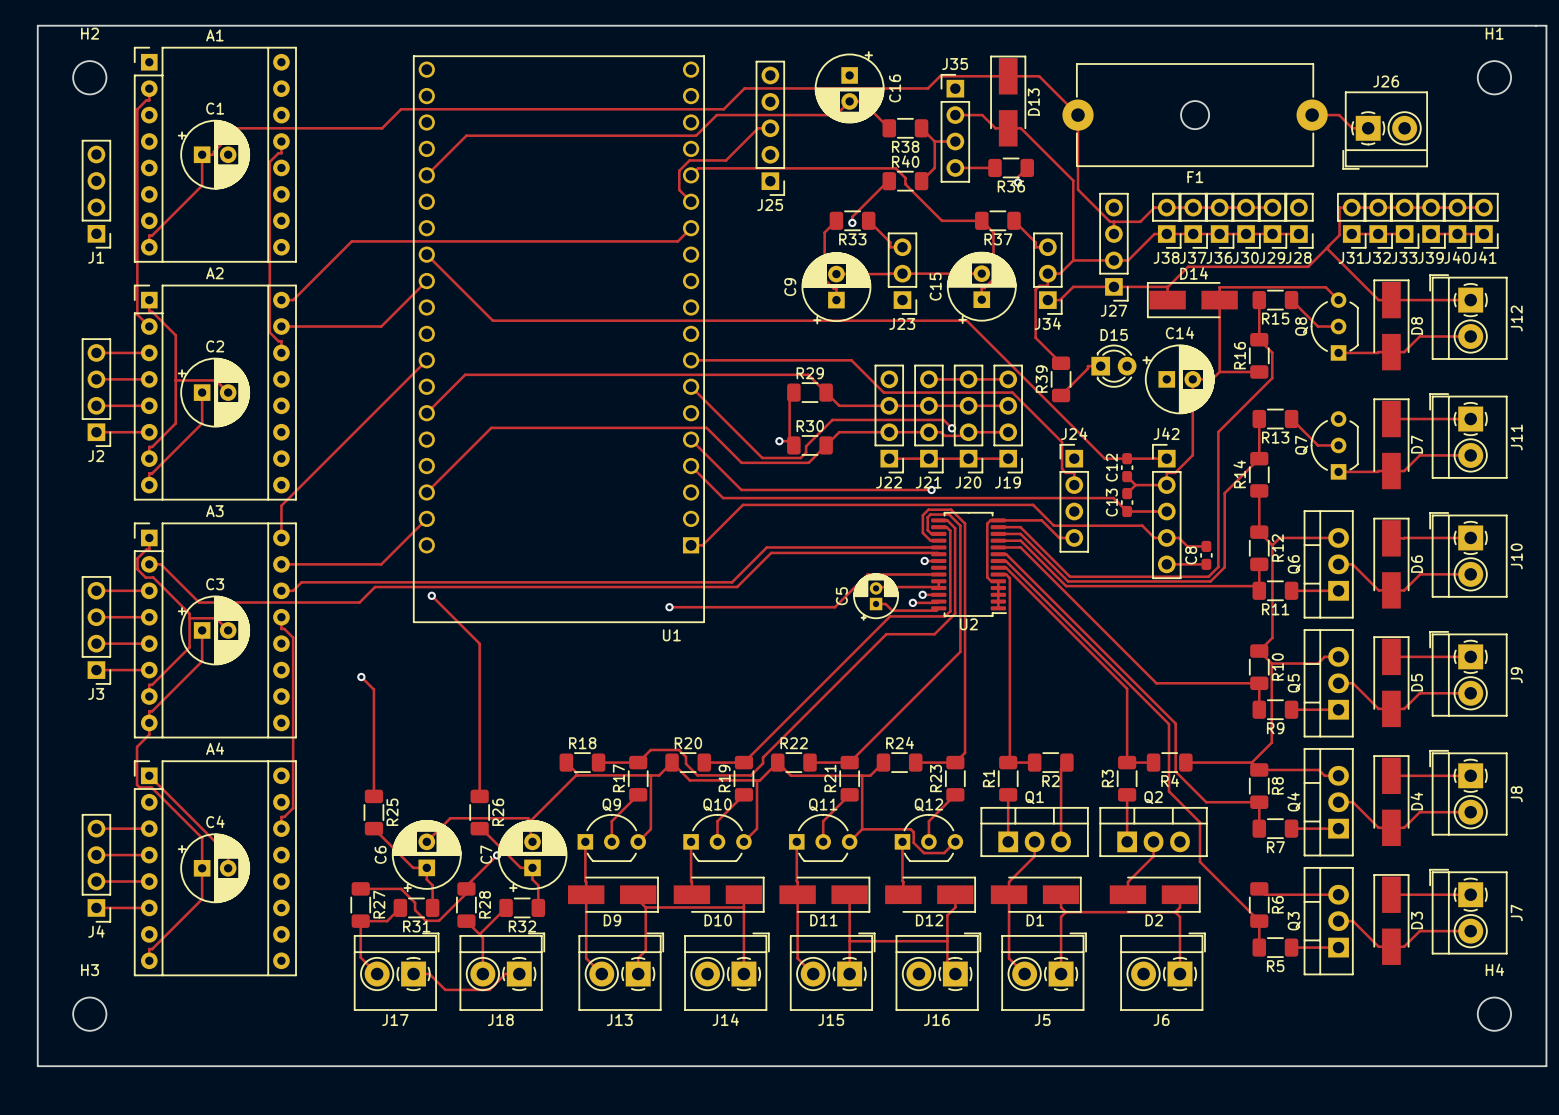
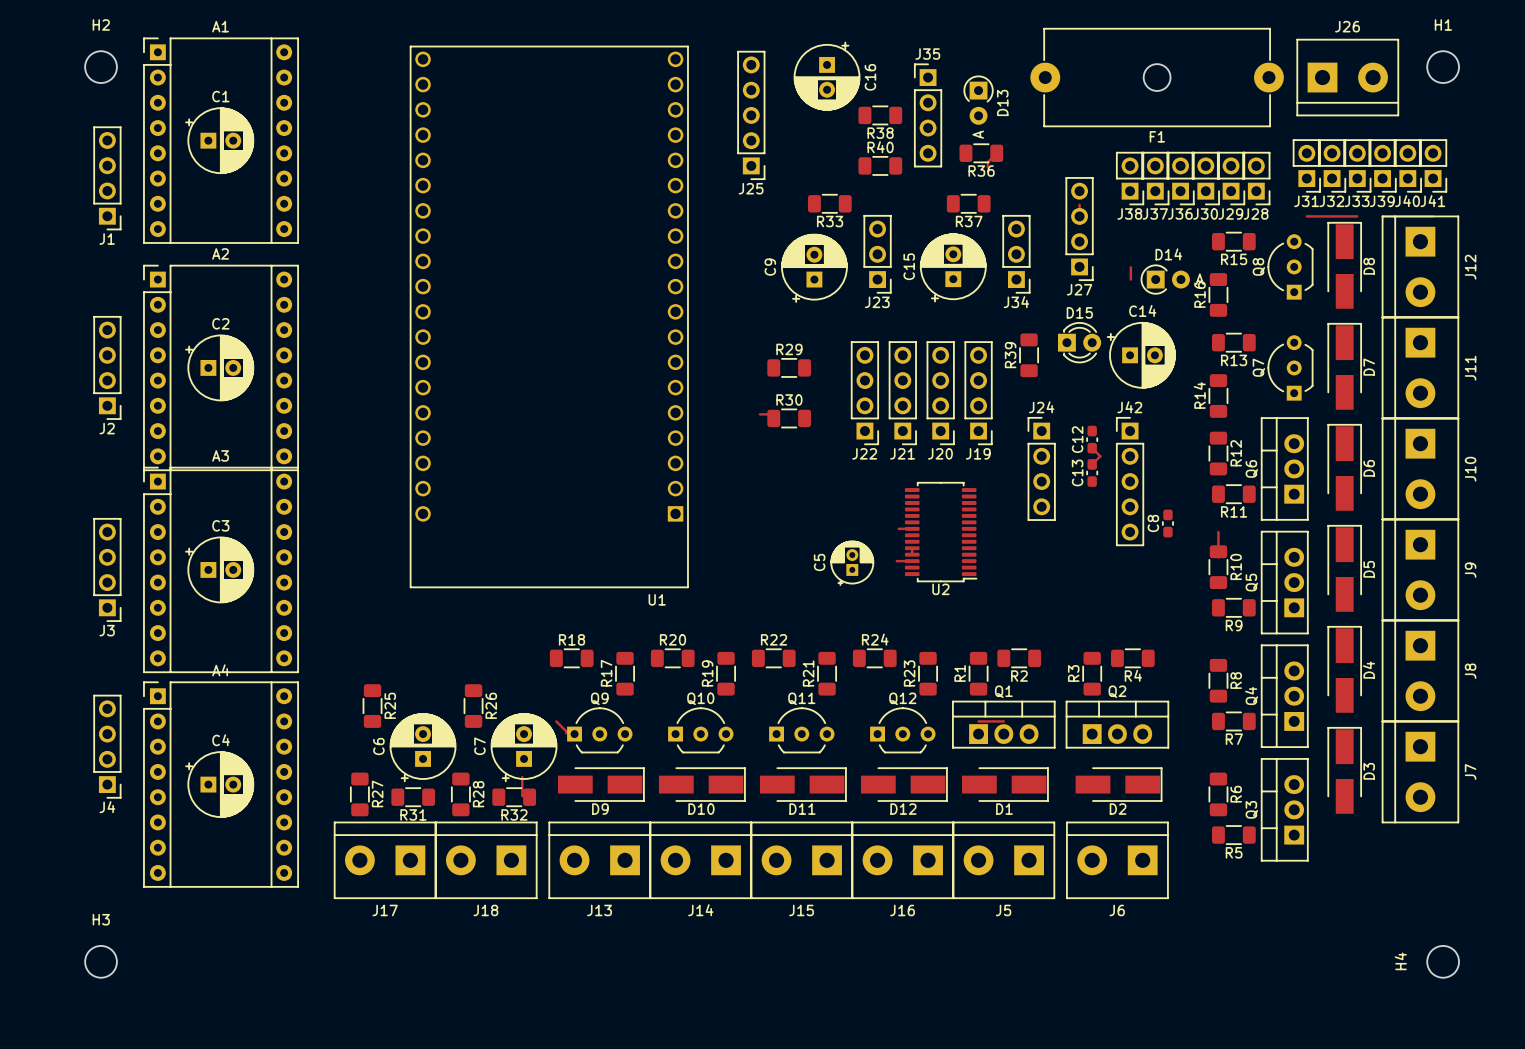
board edge: (37, 25) (37, 1066) (1546, 1066) (1546, 25) (37, 25) -> none
D13 footprint: [990, 55, 1027, 147] -> [963, 75, 994, 125]
track: (149, 88) (149, 100) (146, 100) (137, 109) (137, 314) (149, 326) -> none
J26 footprint: [1342, 91, 1428, 170] -> [1296, 39, 1399, 117]
track: (955, 115) (982, 115) (995, 128) (1020, 128) (1073, 180) (1073, 260) -> none
F1 position: (1195, 115) -> (1157, 77)
track: (1312, 115) (1339, 115) (1352, 128) (1368, 128) -> none
track: (770, 128) (758, 128) (725, 160) (689, 160) (679, 170) (679, 189) (691, 201) -> none
track: (889, 128) (862, 101) (849, 101) (836, 115) (716, 115) (696, 135) (466, 135) (426, 175) -> none
track: (921, 128) (934, 141) -> none
track: (281, 141) (281, 153) (278, 153) (269, 162) (269, 332) (278, 341) (281, 341) (281, 352) -> none
track: (934, 141) (955, 141) -> none
track: (934, 141) (934, 167) (921, 181) -> none
track: (955, 167) (995, 167) -> none
track: (691, 175) (698, 168) (895, 168) (905, 177) (905, 184) (941, 220) (981, 220) (993, 232) (993, 279) (984, 287) (981, 287) (981, 299) -> none
track: (889, 181) (852, 216) (852, 222) -> none
via: (1017, 182) -> none
track: (1272, 207) (1154, 207) (1140, 221) (1110, 221) (1078, 189) (1078, 115) (1039, 76) (940, 76) (927, 88) (744, 88) (723, 109) (401, 109) (382, 128) (237, 128) (213, 151) (213, 154) (202, 154) (202, 185) (152, 235) (149, 235) (149, 247) -> none
track: (1483, 207) (1339, 207) (1339, 235) (1308, 266) (1188, 266) (1167, 287) (1073, 286) (1060, 300) (1047, 300) -> none
track: (836, 220) (824, 232) (824, 279) (833, 288) (836, 288) (836, 300) -> none
track: (868, 220) (890, 242) (890, 247) (902, 247) -> none
track: (1014, 220) (1035, 242) (1035, 247) (1047, 247) -> none
J38 position: (1166, 220) -> (1130, 178)
J37 position: (1193, 220) -> (1155, 178)
J36 position: (1219, 220) -> (1180, 178)
J30 position: (1246, 220) -> (1205, 178)
J29 position: (1272, 220) -> (1231, 178)
J28 position: (1298, 220) -> (1256, 178)
J31 position: (1351, 220) -> (1306, 165)
J32 position: (1378, 220) -> (1332, 165)
J33 position: (1404, 220) -> (1357, 165)
J39 position: (1431, 220) -> (1382, 165)
J40 position: (1457, 220) -> (1407, 165)
J41 position: (1483, 220) -> (1433, 165)
via: (852, 222) -> none
track: (691, 228) (677, 241) (351, 241) (293, 300) (281, 300) -> none
track: (1298, 234) (1154, 234) (1128, 260) (1073, 260) -> none
track: (1326, 248) (1378, 300) (1470, 300) -> none
track: (426, 254) (492, 320) (966, 320) (1104, 458) (1166, 458) -> none
track: (1073, 260) (1060, 273) (1047, 273) (1047, 285) (1039, 285) (1035, 289) (1035, 337) (1061, 363) -> none
track: (981, 273) (836, 274) -> none
J12 footprint: [1429, 274, 1508, 360] -> [1381, 215, 1459, 319]
track: (426, 281) (381, 326) (281, 326) -> none
D14 footprint: [1147, 282, 1238, 318] -> [1140, 264, 1190, 295]
track: (149, 300) (149, 311) (152, 311) (175, 335) (175, 423) (152, 446) (149, 446) (149, 458) -> none
track: (1259, 300) (1259, 339) (1272, 352) (1272, 378) (1218, 432) (1218, 566) (1208, 576) (1070, 576) (1020, 527) (998, 527) -> none
R15 position: (1275, 300) -> (1233, 241)
track: (1291, 300) (1317, 326) (1338, 326) -> none
track: (1338, 300) (1325, 287) (1219, 287) (1219, 371) -> none
D8 position: (1391, 325) -> (1344, 265)
Q8 position: (1334, 326) -> (1290, 266)
track: (1470, 336) (1419, 336) (1404, 352) (1338, 352) -> none
track: (96, 352) (149, 352) -> none
R16 position: (1259, 355) -> (1218, 294)
track: (426, 360) (281, 505) (281, 537) -> none
track: (691, 360) (851, 360) (883, 392) (1012, 392) (1062, 442) (1062, 469) (1065, 472) (1074, 472) (1074, 485) -> none
track: (1100, 366) (1087, 366) (1087, 368) (1061, 395) -> none
track: (1219, 371) (1212, 379) (1192, 379) (1192, 455) (1175, 472) (1166, 472) (1166, 485) (1135, 485) -> none
track: (1219, 371) (1259, 371) -> none
track: (96, 379) (149, 379) -> none
track: (928, 379) (1008, 379) -> none
track: (175, 380) (216, 380) (228, 392) -> none
track: (691, 386) (762, 458) (800, 458) (806, 452) (806, 446) (832, 419) (943, 419) (951, 428) -> none
track: (202, 392) (202, 423) (152, 473) (149, 473) (149, 485) -> none
track: (793, 392) (789, 396) (789, 441) (793, 445) -> none
J11 footprint: [1429, 393, 1508, 479] -> [1381, 316, 1459, 420]
track: (96, 405) (149, 405) -> none
track: (1008, 405) (839, 405) (808, 374) (465, 374) (426, 413) -> none
track: (1259, 419) (1259, 458) (1224, 493) (1224, 567) (1210, 581) (1068, 581) (1020, 533) (998, 533) -> none
R13 position: (1275, 419) -> (1233, 342)
track: (1291, 419) (1317, 445) (1338, 445) -> none
track: (1391, 419) (1470, 419) -> none
via: (951, 428) -> none
track: (96, 432) (149, 432) -> none
track: (1008, 432) (968, 432) (964, 435) (944, 435) (941, 432) (839, 432) (808, 462) (741, 462) (706, 427) (491, 427) (426, 492) -> none
track: (691, 439) (741, 489) (931, 489) -> none
via: (779, 441) -> none
D7 position: (1391, 443) -> (1344, 366)
Q7 position: (1334, 445) -> (1290, 367)
track: (1470, 455) (1419, 455) (1404, 471) (1338, 471) -> none
track: (889, 458) (1008, 458) -> none
track: (691, 466) (723, 498) (1113, 498) (1127, 511) (1166, 511) -> none
R14 position: (1259, 474) -> (1218, 395)
via: (931, 489) -> none
track: (1259, 490) (1259, 532) (1272, 545) -> none
J10 footprint: [1429, 512, 1508, 598] -> [1381, 417, 1459, 521]
track: (426, 518) (381, 564) (281, 564) -> none
track: (938, 520) (947, 520) (955, 528) (955, 613) (934, 634) (886, 634) (763, 757) (763, 763) (751, 775) (697, 775) (686, 763) (686, 756) (679, 750) (650, 750) (638, 762) (598, 762) -> none
track: (938, 527) (946, 527) (950, 530) (950, 611) (945, 616) (890, 616) (743, 762) (704, 762) -> none
track: (938, 533) (931, 533) (927, 530) (927, 517) (930, 514) (949, 514) (960, 525) (960, 651) (849, 762) (810, 762) -> none
track: (149, 537) (149, 549) (146, 549) (137, 558) (137, 569) (145, 577) (153, 577) (189, 613) (189, 647) (152, 684) (149, 684) (149, 696) -> none
track: (1074, 537) (1059, 537) (1041, 520) (990, 520) (987, 523) (987, 577) (991, 581) (998, 581) (998, 608) -> none
track: (1338, 537) (1279, 537) (1272, 545) -> none
track: (1470, 537) (1391, 538) -> none
track: (938, 540) (930, 540) (922, 532) (922, 515) (928, 509) (951, 509) (965, 523) (965, 752) (955, 762) (915, 762) -> none
track: (998, 540) (1020, 540) (1066, 586) (1259, 586) -> none
track: (691, 545) (702, 545) (742, 504) (1033, 504) (1053, 525) (1142, 525) (1154, 537) (1179, 537) (1187, 546) (1206, 546) -> none
track: (1272, 545) (1272, 637) (1259, 651) (1271, 663) -> none
track: (938, 547) (766, 547) (732, 582) (301, 582) (293, 590) (281, 590) -> none
track: (998, 547) (1020, 547) (1156, 683) (1259, 683) (1259, 709) -> none
R12 position: (1259, 548) -> (1218, 453)
track: (938, 554) (771, 552) (737, 587) (375, 587) (359, 602) (199, 602) (161, 564) (149, 564) -> none
track: (998, 554) (1006, 554) (1175, 723) (1175, 771) (1206, 802) (1259, 802) (1259, 828) -> none
via: (924, 560) -> none
track: (998, 560) (1005, 560) (1169, 724) (1169, 791) (1199, 822) (1199, 861) (1259, 921) (1259, 947) -> none
D6 position: (1391, 563) -> (1344, 467)
track: (1166, 564) (1206, 564) -> none
Q6 position: (1328, 564) -> (1284, 468)
track: (1338, 564) (1352, 564) (1378, 590) (1404, 590) (1420, 574) (1470, 574) -> none
track: (998, 567) (1006, 567) (1127, 688) (1127, 762) (1153, 762) -> none
track: (938, 574) (867, 574) (834, 607) (669, 607) -> none
track: (998, 574) (1006, 574) (1009, 578) (1009, 762) -> none
track: (938, 587) (876, 588) -> none
track: (96, 590) (149, 590) -> none
R11 position: (1275, 590) -> (1233, 494)
track: (1291, 590) (1338, 590) -> none
via: (922, 594) -> none
track: (431, 595) (479, 643) (479, 796) -> none
via: (431, 595) -> none
track: (938, 601) (912, 602) -> none
via: (912, 602) -> none
track: (876, 604) (885, 604) (892, 610) (936, 610) (938, 608) -> none
via: (669, 607) -> none
track: (96, 617) (149, 617) -> none
track: (281, 617) (281, 628) (284, 628) (293, 637) (293, 808) (284, 816) (281, 816) (281, 828) -> none
track: (189, 618) (216, 618) (228, 630) -> none
J3 position: (96, 630) -> (107, 569)
track: (202, 630) (202, 661) (152, 711) (149, 711) (149, 734) (137, 746) (137, 784) (139, 787) (151, 787) (202, 838) (202, 899) (152, 949) (149, 949) (149, 960) -> none
C3 position: (213, 630) -> (219, 569)
A3 position: (215, 630) -> (221, 569)
J9 footprint: [1429, 631, 1508, 717] -> [1381, 518, 1459, 622]
track: (96, 643) (149, 643) -> none
track: (1338, 656) (1324, 656) (1318, 663) (1271, 663) -> none
track: (1391, 656) (1470, 656) -> none
track: (1271, 663) (1271, 742) (1251, 762) -> none
R10 position: (1259, 667) -> (1218, 567)
track: (96, 670) (149, 670) -> none
track: (361, 677) (373, 689) (373, 796) -> none
via: (361, 677) -> none
D5 position: (1391, 681) -> (1344, 568)
Q5 position: (1328, 683) -> (1284, 582)
track: (1338, 683) (1353, 683) (1378, 708) (1404, 708) (1419, 693) (1470, 693) -> none
R9 position: (1275, 709) -> (1233, 607)
track: (1291, 709) (1338, 709) -> none
J8 footprint: [1429, 750, 1508, 836] -> [1381, 619, 1459, 723]
R18 position: (582, 762) -> (571, 658)
R20 position: (688, 762) -> (672, 658)
R22 position: (793, 762) -> (773, 658)
track: (883, 762) (870, 775) (790, 775) (777, 762) (759, 780) (689, 780) (672, 762) (659, 775) (576, 774) (530, 820) (528, 818) (450, 818) (426, 841) -> none
R24 position: (899, 762) -> (874, 658)
R2 position: (1050, 762) -> (1019, 658)
track: (1066, 762) (1061, 768) (1061, 841) -> none
R4 position: (1169, 762) -> (1132, 658)
track: (1185, 762) (1251, 762) -> none
track: (1251, 762) (1259, 769) (1318, 769) (1324, 775) (1338, 775) -> none
track: (149, 775) (228, 854) (228, 868) -> none
track: (650, 775) (650, 829) (638, 841) -> none
track: (862, 775) (862, 829) -> none
track: (1391, 775) (1470, 775) -> none
R17 position: (638, 778) -> (625, 673)
R19 position: (743, 778) -> (726, 673)
R21 position: (849, 778) -> (827, 673)
R23 position: (955, 778) -> (928, 673)
R1 position: (1008, 778) -> (978, 673)
R3 position: (1127, 778) -> (1092, 673)
track: (757, 780) (757, 828) (743, 841) -> none
R8 position: (1259, 786) -> (1218, 680)
track: (638, 794) (611, 821) (611, 841) -> none
track: (743, 794) (717, 821) (717, 841) -> none
track: (849, 794) (823, 821) (823, 841) -> none
track: (955, 794) (928, 821) (928, 841) -> none
track: (1008, 794) (1008, 841) -> none
track: (1127, 794) (1127, 841) -> none
D4 position: (1391, 800) -> (1344, 669)
Q4 position: (1328, 802) -> (1284, 696)
track: (1338, 802) (1353, 802) (1378, 827) (1404, 827) (1419, 812) (1470, 812) -> none
R25 position: (373, 812) -> (372, 706)
R26 position: (479, 812) -> (473, 706)
track: (96, 828) (149, 828) -> none
track: (373, 828) (413, 867) (426, 867) (426, 879) (432, 885) (432, 907) -> none
track: (479, 828) (520, 867) (532, 867) (532, 879) (538, 885) (538, 907) -> none
R7 position: (1275, 828) -> (1233, 721)
track: (1291, 828) (1338, 828) -> none
track: (862, 829) (849, 841) -> none
track: (862, 829) (910, 829) (913, 832) (913, 842) (923, 853) (944, 853) (955, 841) -> none
Q1 position: (1034, 831) -> (1003, 724)
Q2 position: (1153, 831) -> (1117, 724)
Q9 position: (611, 837) -> (599, 730)
Q10 position: (717, 837) -> (700, 730)
Q11 position: (823, 837) -> (801, 730)
Q12 position: (928, 837) -> (902, 730)
track: (585, 841) (586, 958) (601, 974) -> none
track: (691, 841) (691, 894) -> none
track: (796, 841) (797, 958) (813, 974) -> none
track: (902, 841) (903, 894) -> none
track: (1034, 841) (1034, 856) (1009, 881) (1009, 958) (1024, 974) -> none
track: (1153, 841) (1153, 856) (1127, 881) (1127, 894) -> none
track: (96, 855) (149, 855) -> none
track: (497, 855) (466, 886) (466, 893) (439, 920) (425, 920) (415, 910) (415, 902) (401, 888) (360, 888) -> none
via: (497, 855) -> none
C6 position: (426, 856) -> (423, 747)
C7 position: (532, 856) -> (524, 747)
J4 position: (96, 868) -> (107, 746)
C4 position: (213, 868) -> (219, 784)
A4 position: (215, 868) -> (221, 784)
J7 footprint: [1429, 869, 1508, 955] -> [1381, 720, 1459, 824]
track: (96, 881) (149, 881) -> none
track: (1259, 888) (1265, 894) (1338, 894) -> none
D9 position: (613, 894) -> (601, 784)
D10 position: (719, 894) -> (702, 784)
track: (743, 894) (743, 974) -> none
D11 position: (824, 894) -> (803, 784)
track: (849, 894) (849, 974) -> none
D12 position: (930, 894) -> (904, 784)
track: (955, 894) (955, 907) (947, 915) (947, 974) (955, 974) -> none
D1 position: (1036, 894) -> (1005, 784)
track: (1061, 894) (1061, 907) (1065, 912) -> none
D2 position: (1155, 894) -> (1118, 784)
track: (1179, 894) (1179, 907) (1175, 912) -> none
track: (1391, 894) (1470, 894) -> none
R27 position: (360, 905) -> (359, 794)
R28 position: (466, 905) -> (460, 794)
R6 position: (1259, 905) -> (1218, 794)
track: (96, 907) (149, 907) -> none
track: (400, 907) (387, 921) (360, 921) (360, 957) (377, 974) -> none
R31 position: (416, 907) -> (413, 797)
track: (506, 907) (479, 934) -> none
R32 position: (522, 907) -> (514, 797)
track: (743, 907) (645, 907) (645, 950) (638, 958) (638, 974) -> none
track: (1065, 912) (1175, 912) -> none
track: (1065, 912) (1061, 916) (1061, 974) -> none
track: (1175, 912) (1179, 916) (1179, 974) -> none
D3 position: (1391, 919) -> (1344, 770)
track: (466, 921) (482, 937) (482, 974) -> none
Q3 position: (1328, 921) -> (1284, 809)
track: (1338, 921) (1353, 921) (1378, 946) (1404, 946) (1419, 931) (1470, 931) -> none
J17 footprint: [354, 932, 440, 1011] -> [334, 821, 437, 899]
J18 footprint: [459, 932, 545, 1011] -> [435, 821, 538, 899]
J13 footprint: [578, 932, 664, 1011] -> [548, 821, 651, 899]
J14 footprint: [684, 932, 770, 1011] -> [649, 821, 752, 899]
J15 footprint: [790, 932, 876, 1011] -> [750, 821, 853, 899]
J16 footprint: [895, 932, 981, 1011] -> [851, 821, 954, 899]
J5 footprint: [1001, 932, 1087, 1011] -> [952, 821, 1055, 899]
J6 footprint: [1120, 932, 1206, 1011] -> [1066, 821, 1169, 899]
track: (849, 941) (947, 941) -> none
R5 position: (1275, 947) -> (1233, 835)
track: (1291, 947) (1338, 947) -> none
H4 name rotation: 0° (1494, 969) -> 90° counterclockwise (1400, 961)
H4 name position: H4 (1494, 969) -> H4 (1400, 961)
track: (413, 974) (429, 974) (445, 989) (489, 989) (503, 974) (519, 974) -> none

